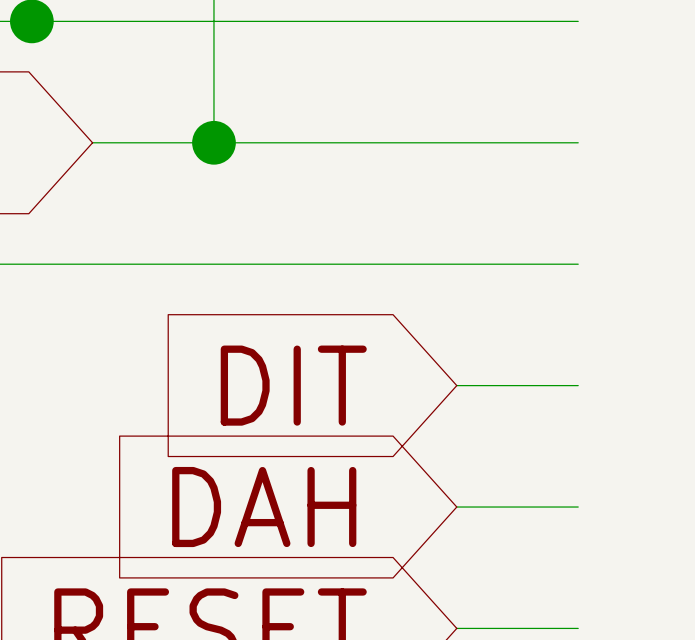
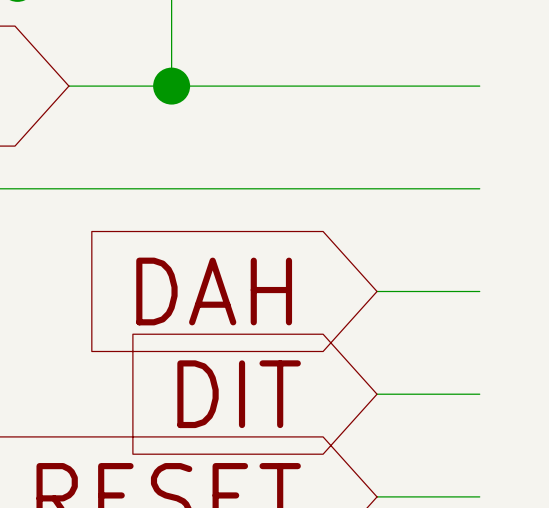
global label: DIT (293, 385) -> DAH (214, 291)
global label: DAH (264, 507) -> DIT (239, 394)

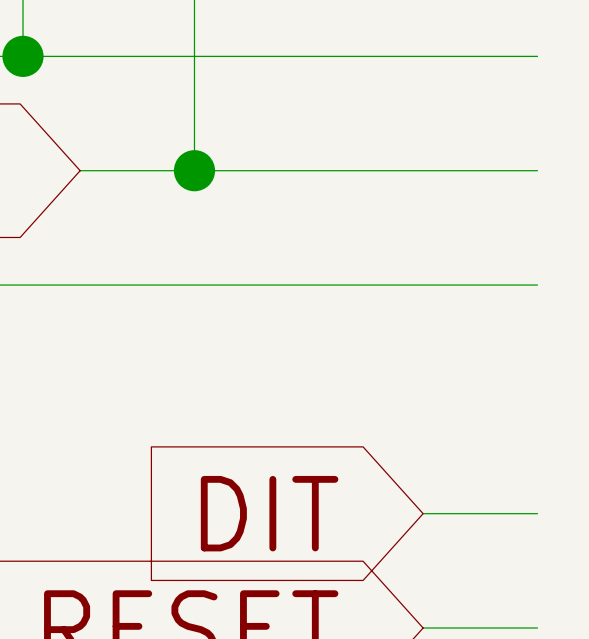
global label: DAH (214, 291) -> none
wire: (377, 291) (479, 291) -> none

